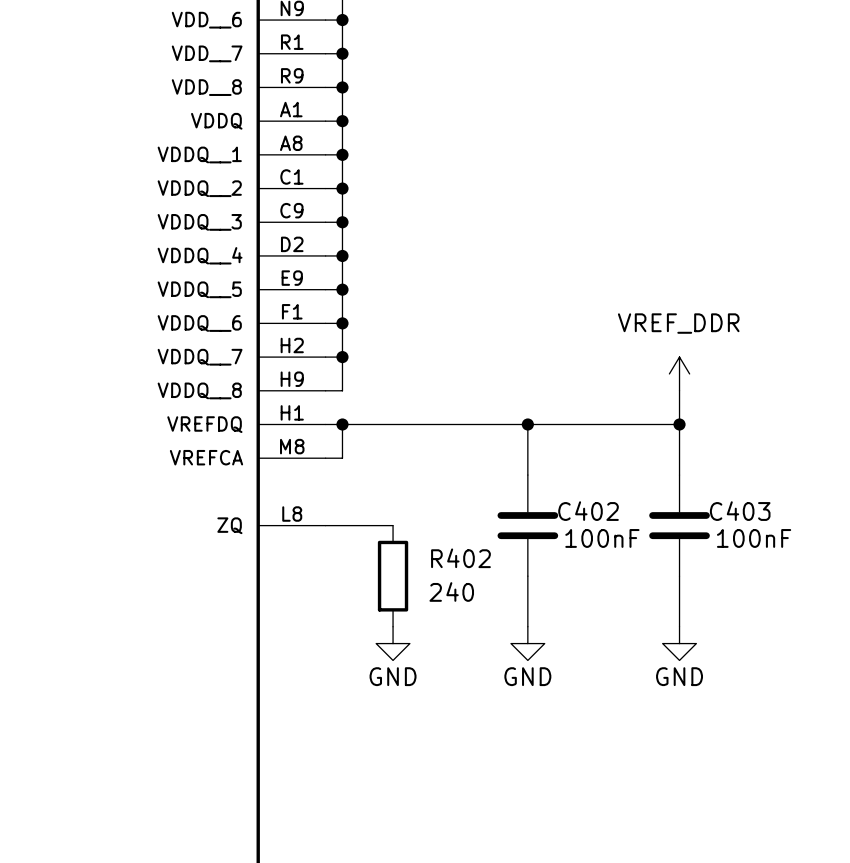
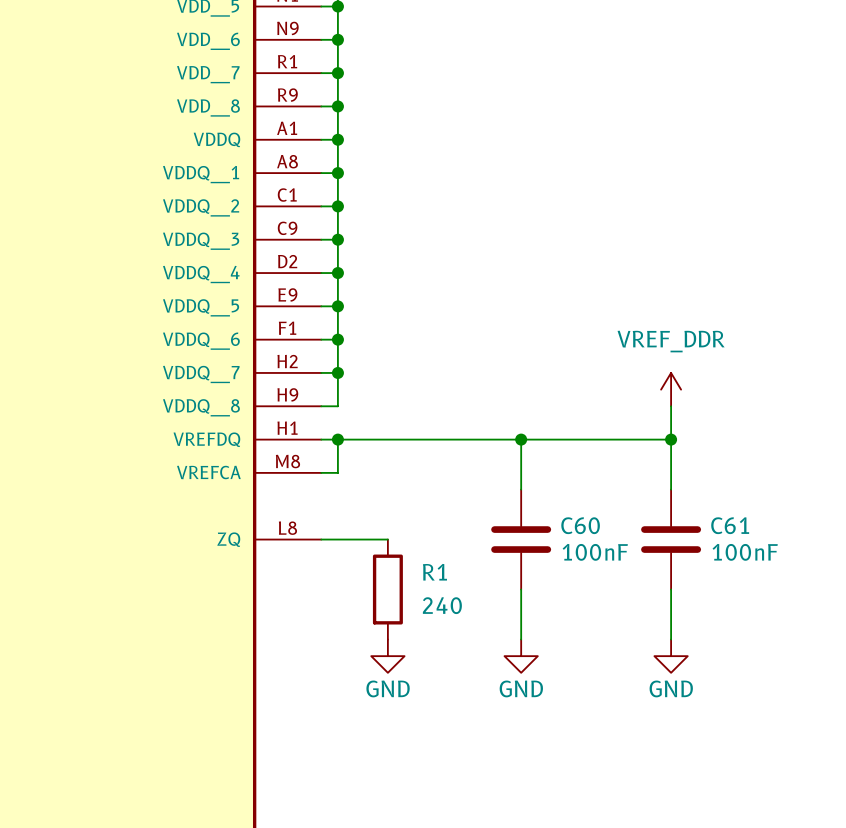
C402 name: C402 (588, 511) -> C60 (580, 525)
C403 name: C403 (740, 511) -> C61 (730, 525)
R402 name: R402 (460, 558) -> R1 (434, 572)

